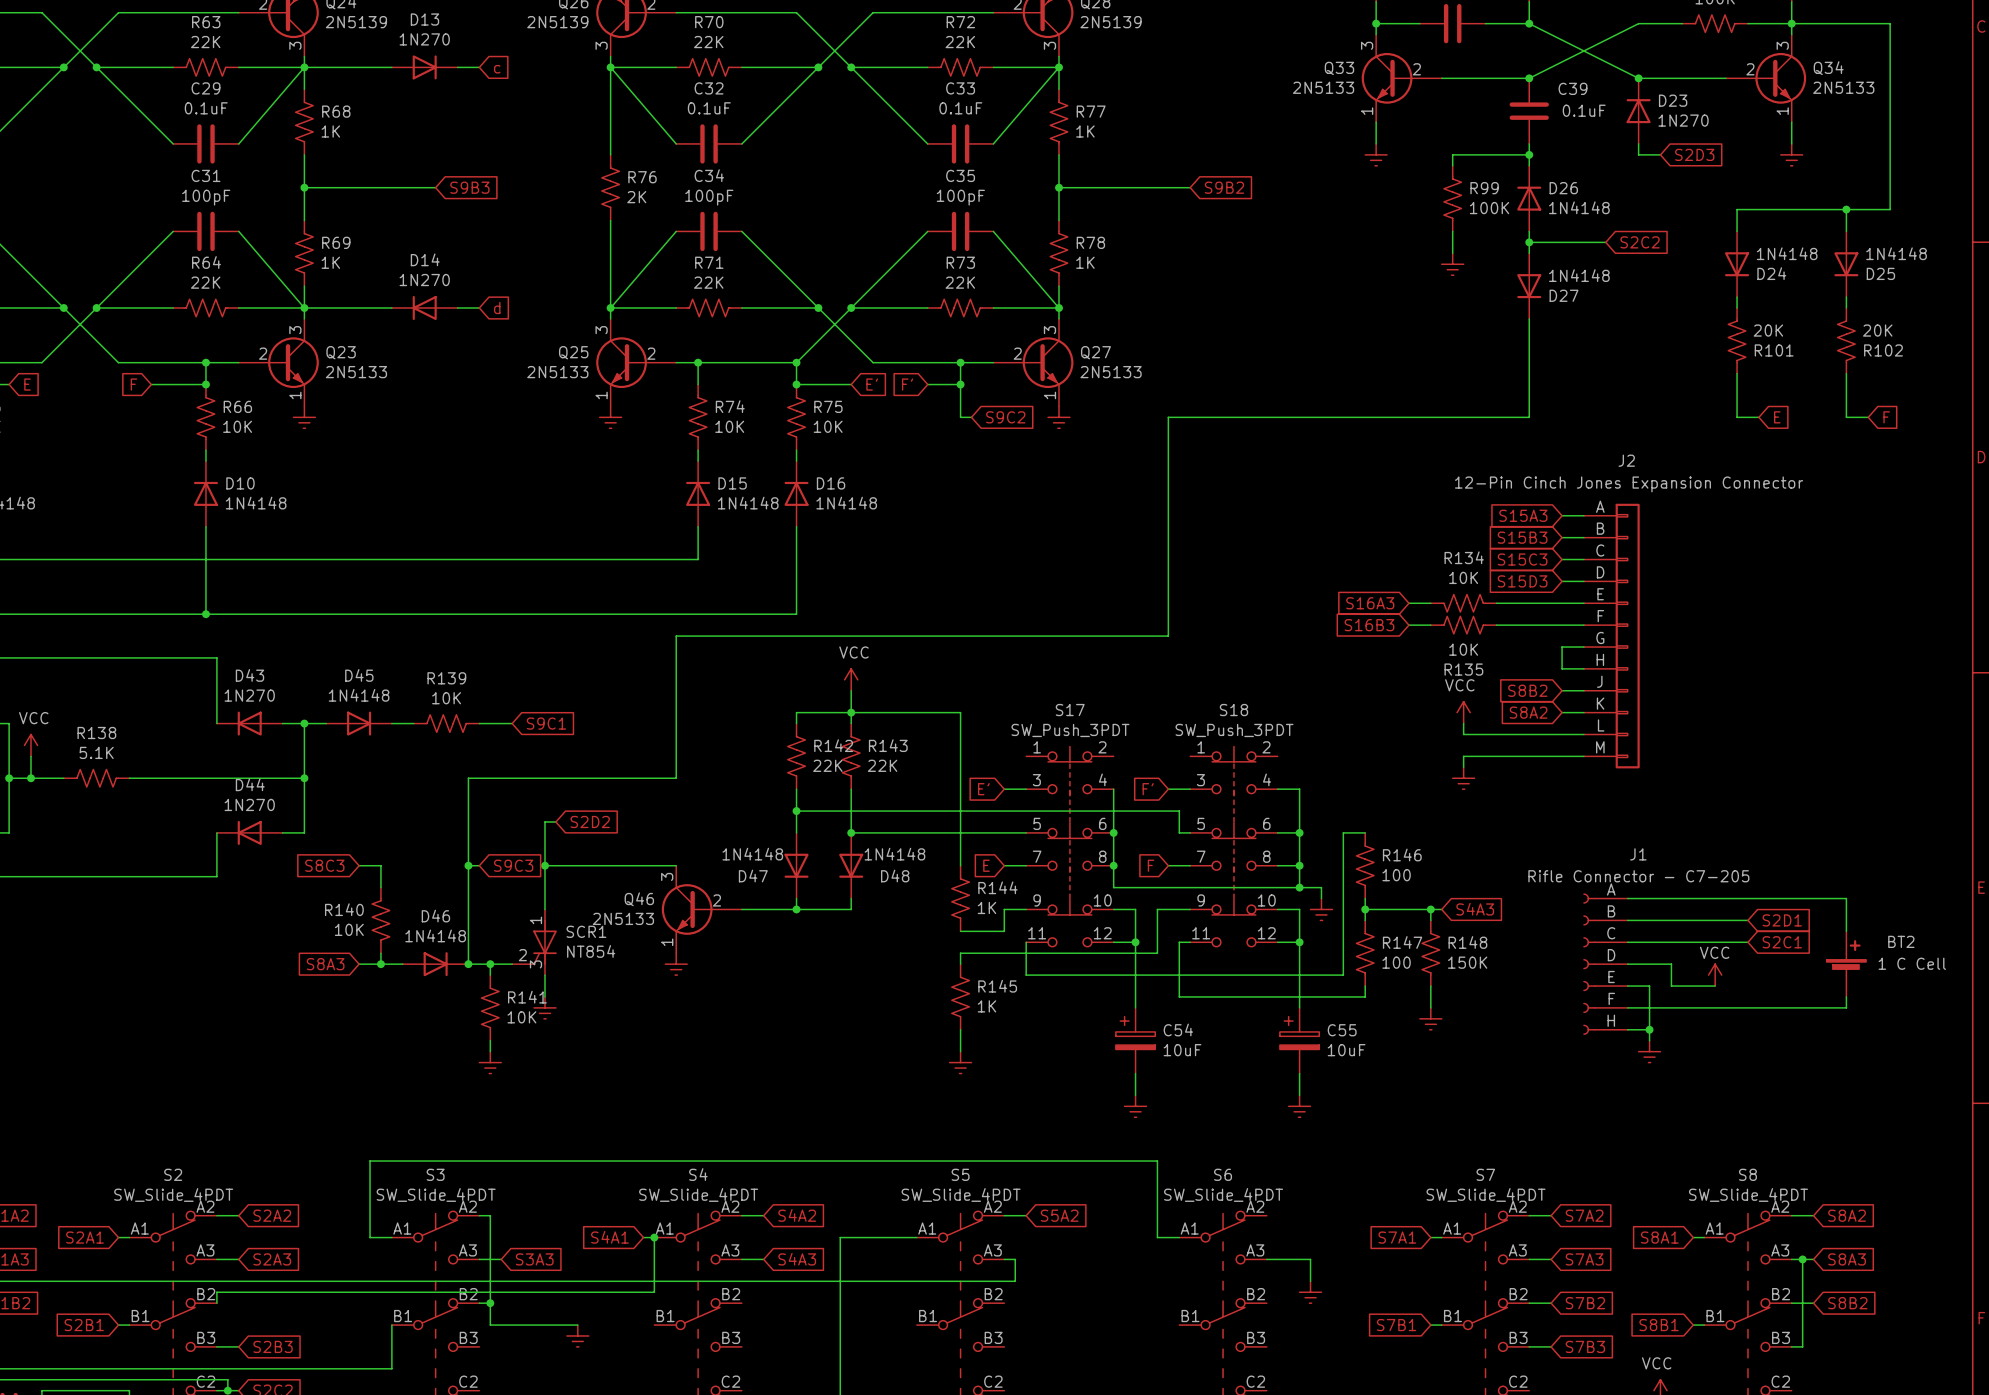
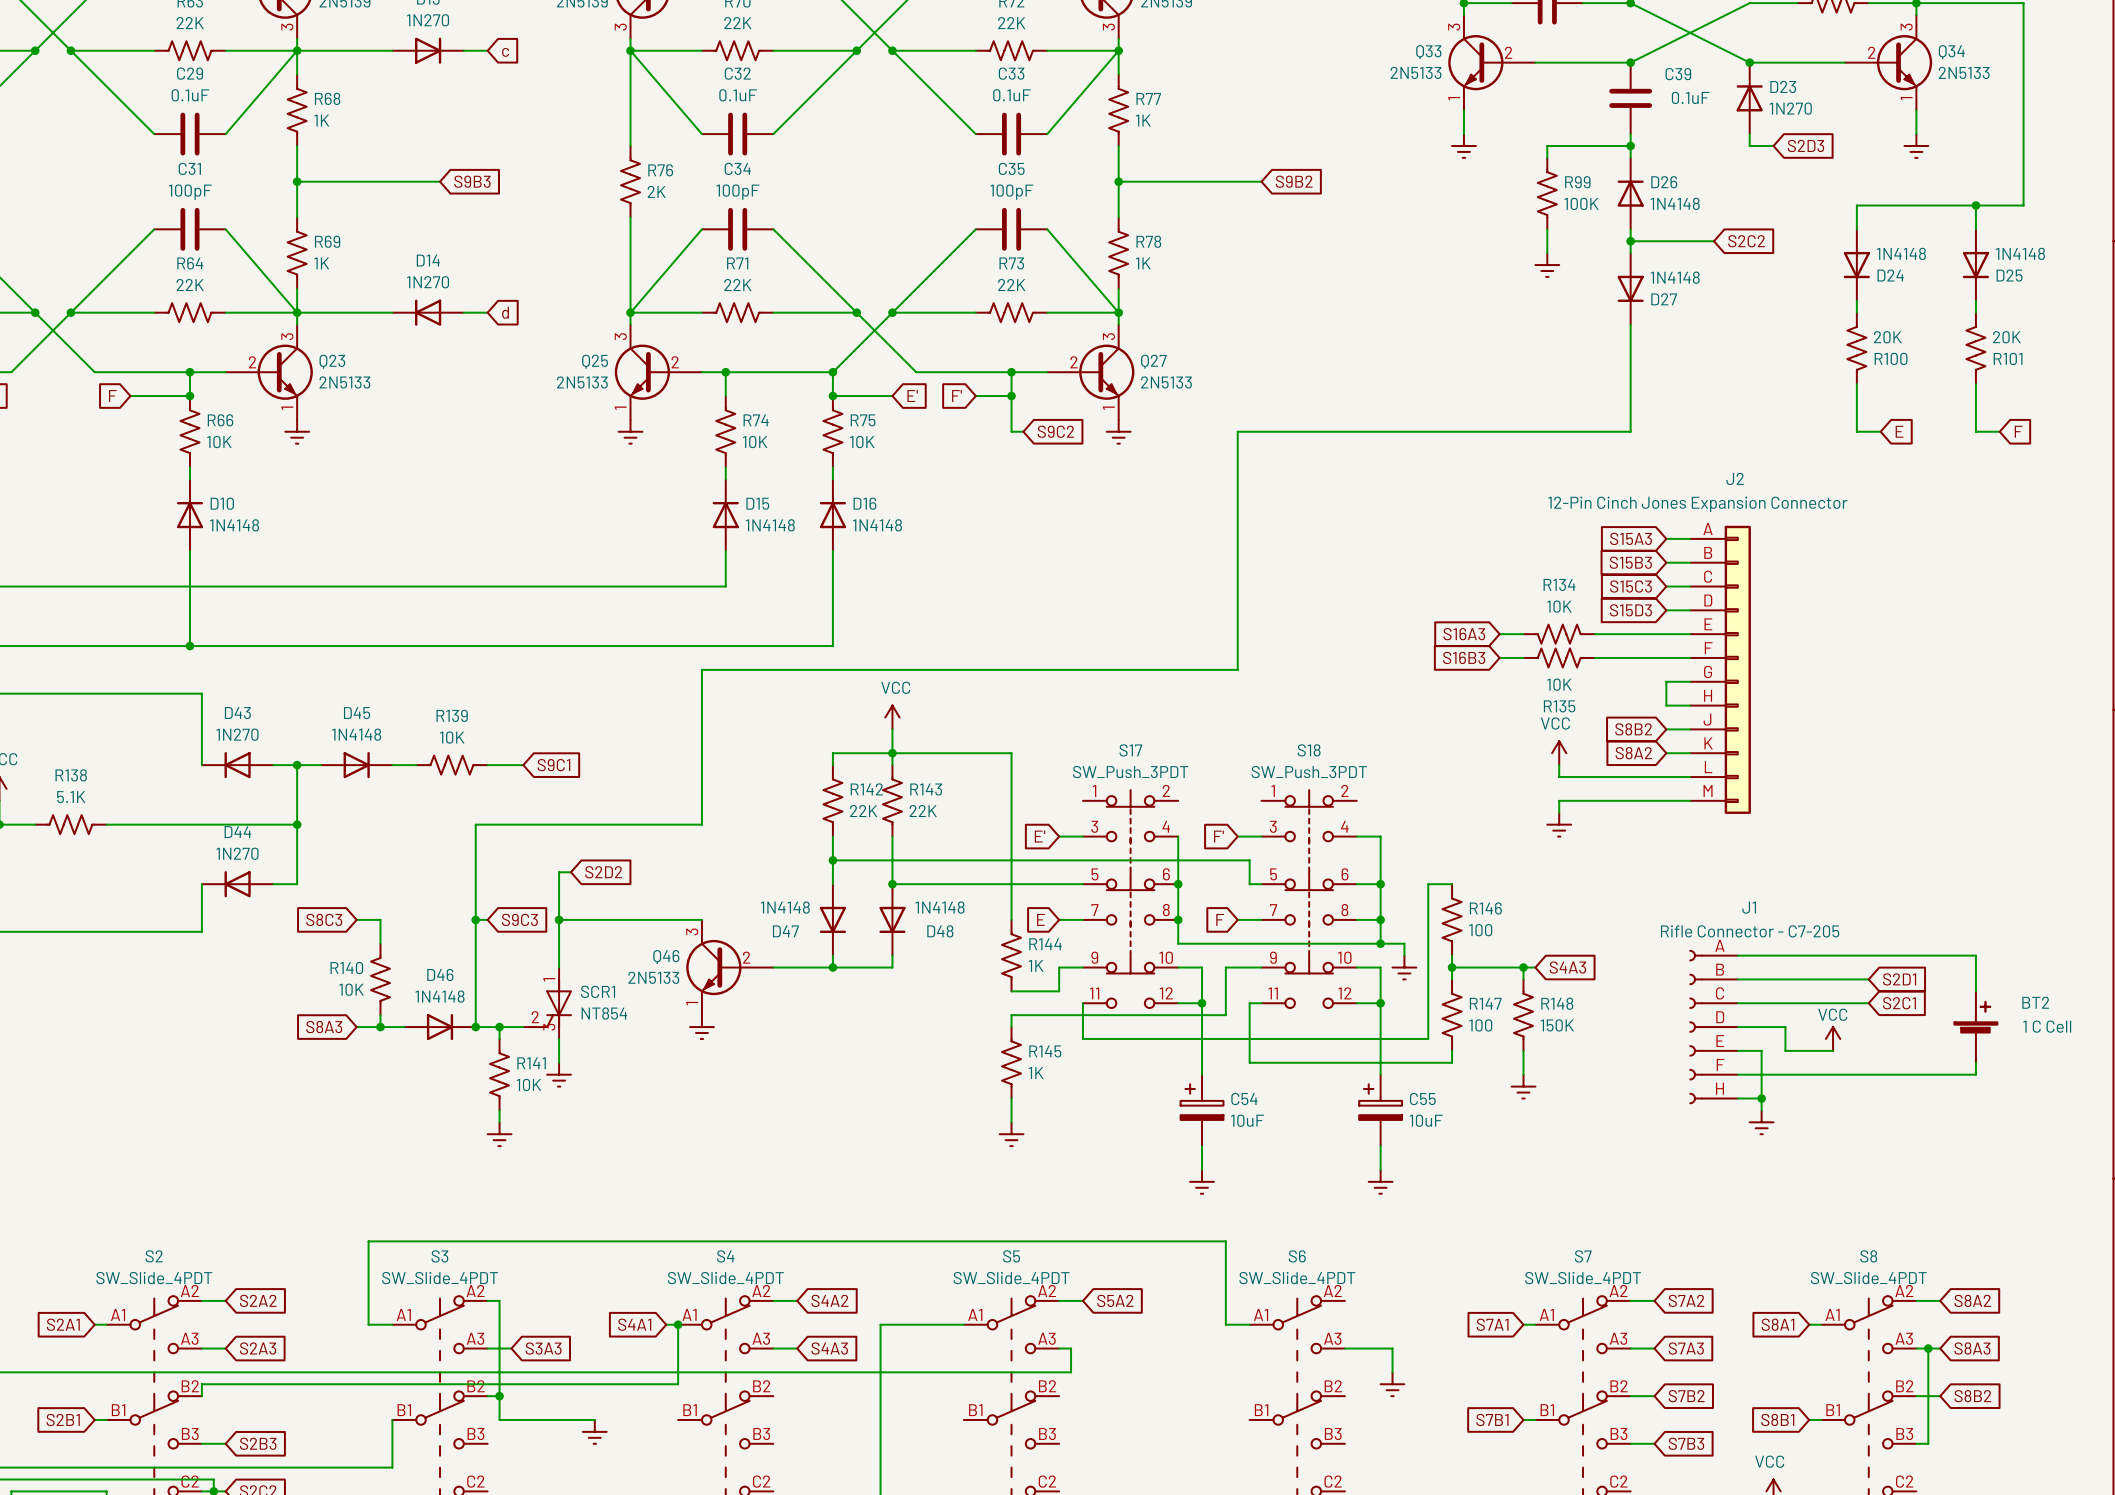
R101 name: R101 (1774, 350) -> R100 (1891, 358)
R102 name: R102 (1883, 350) -> R101 (2008, 358)

